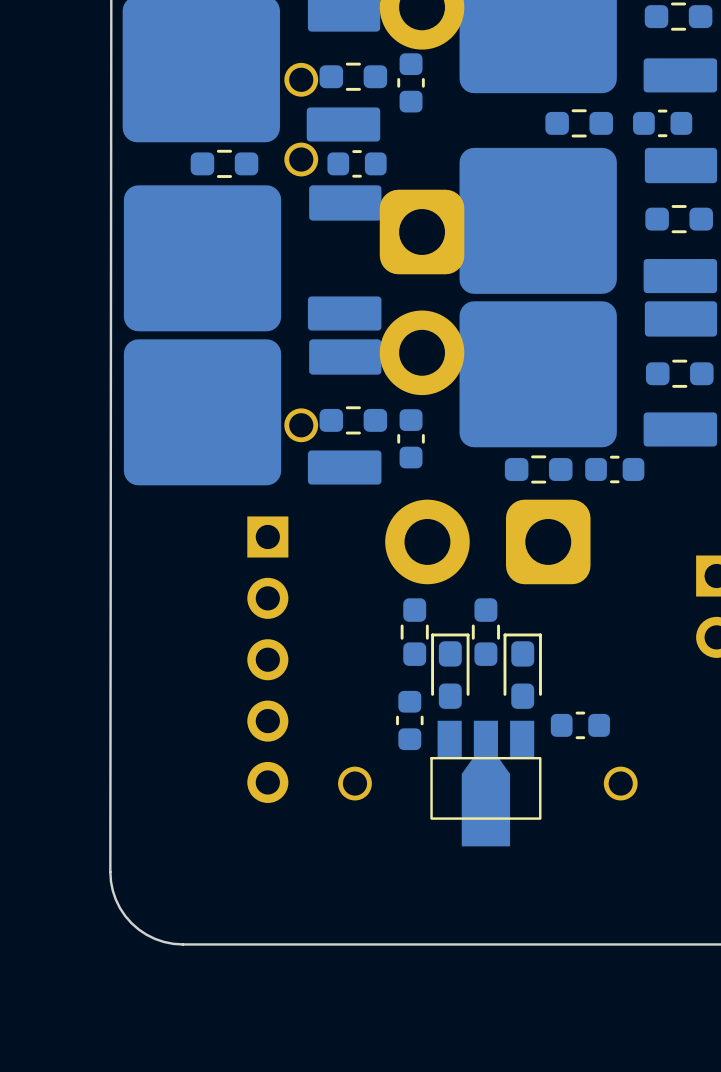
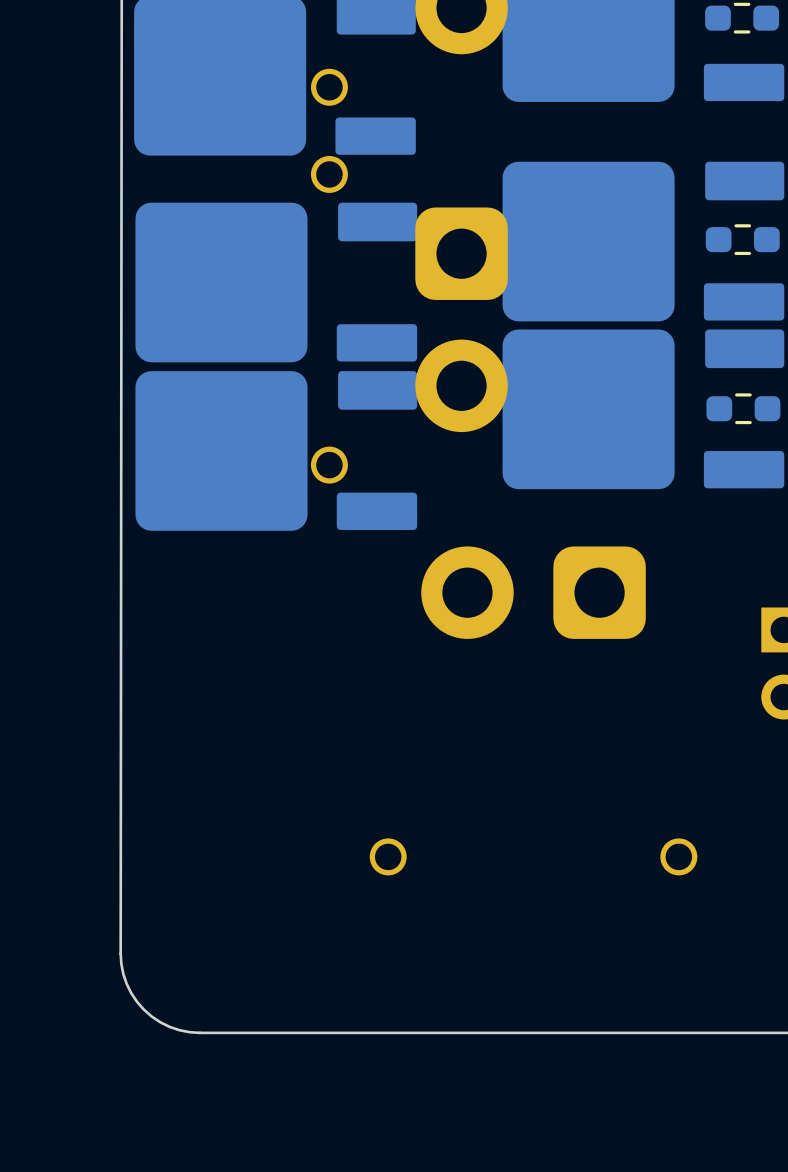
part: (353, 76) -> none
part: (411, 82) -> none
part: (579, 123) -> none
part: (662, 123) -> none
part: (224, 163) -> none
part: (357, 163) -> none
part: (353, 420) -> none
part: (411, 438) -> none
part: (538, 469) -> none
part: (614, 469) -> none
part: (414, 632) -> none
part: (485, 632) -> none
part: (267, 659) -> none
part: (450, 671) -> none
part: (522, 671) -> none
part: (409, 720) -> none
part: (580, 725) -> none
part: (485, 783) -> none

